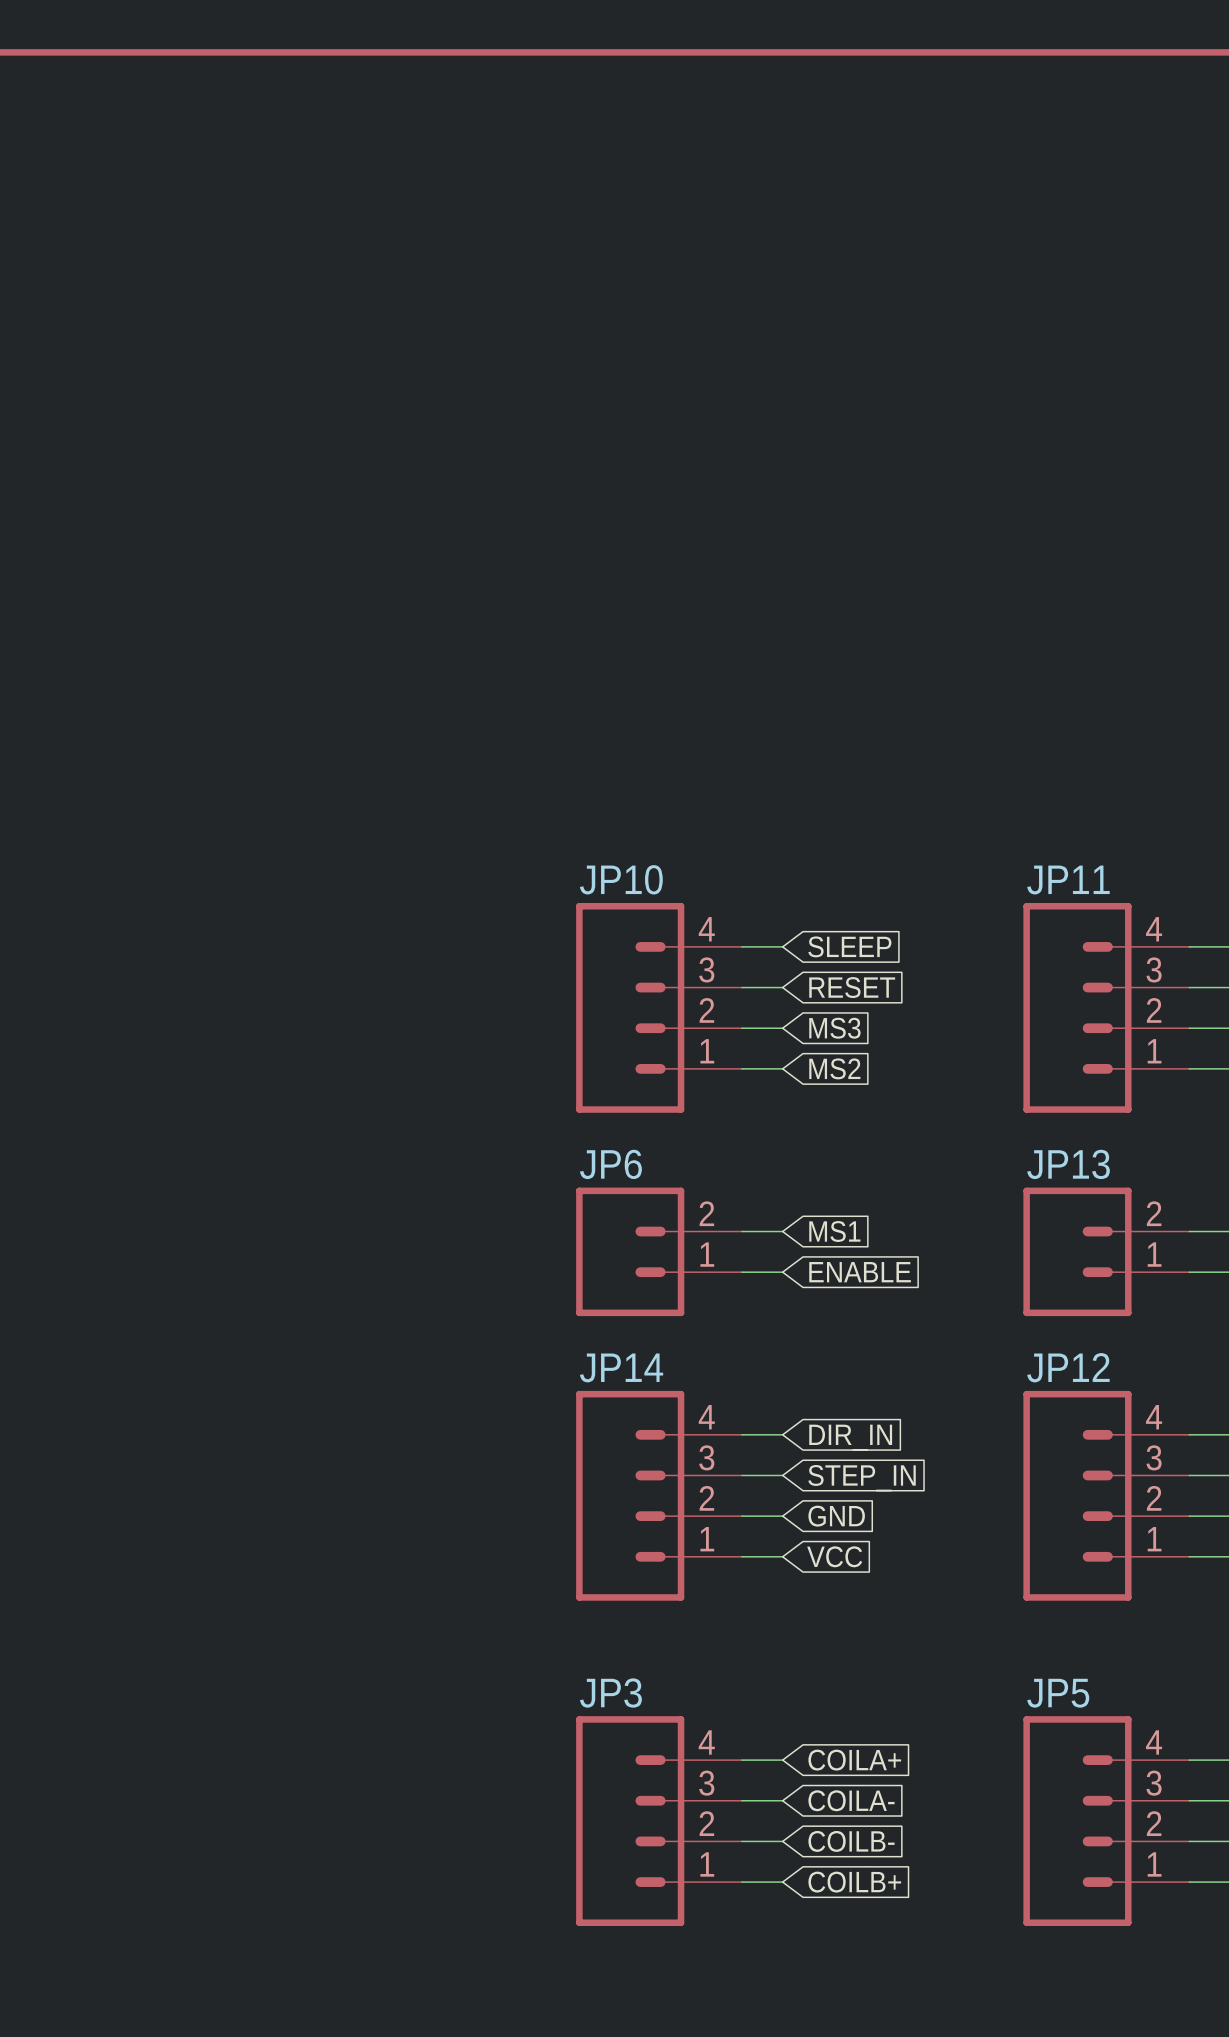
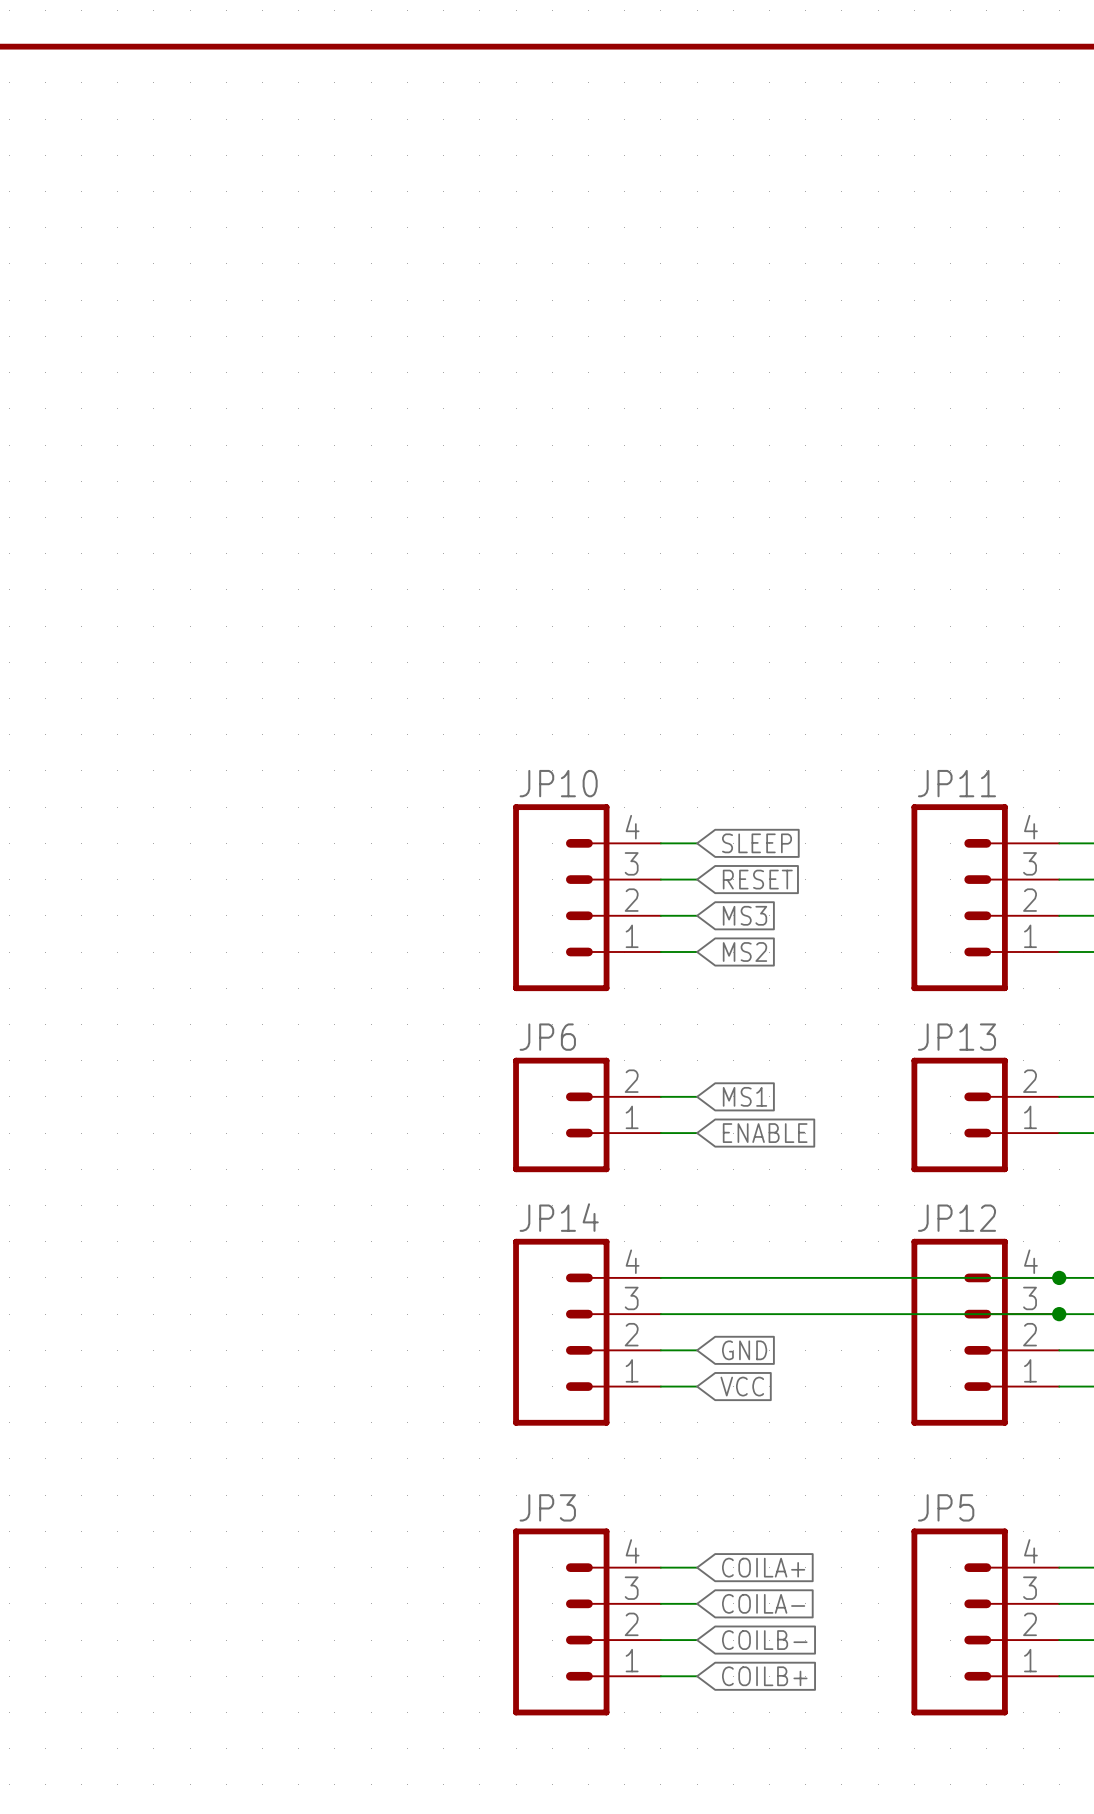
wire: none -> (697, 1277) (1059, 1277)
junction: none -> (1059, 1277)
global label: DIR_IN (850, 1437) -> none
wire: none -> (697, 1314) (1059, 1314)
junction: none -> (1059, 1314)
global label: STEP_IN (862, 1478) -> none

